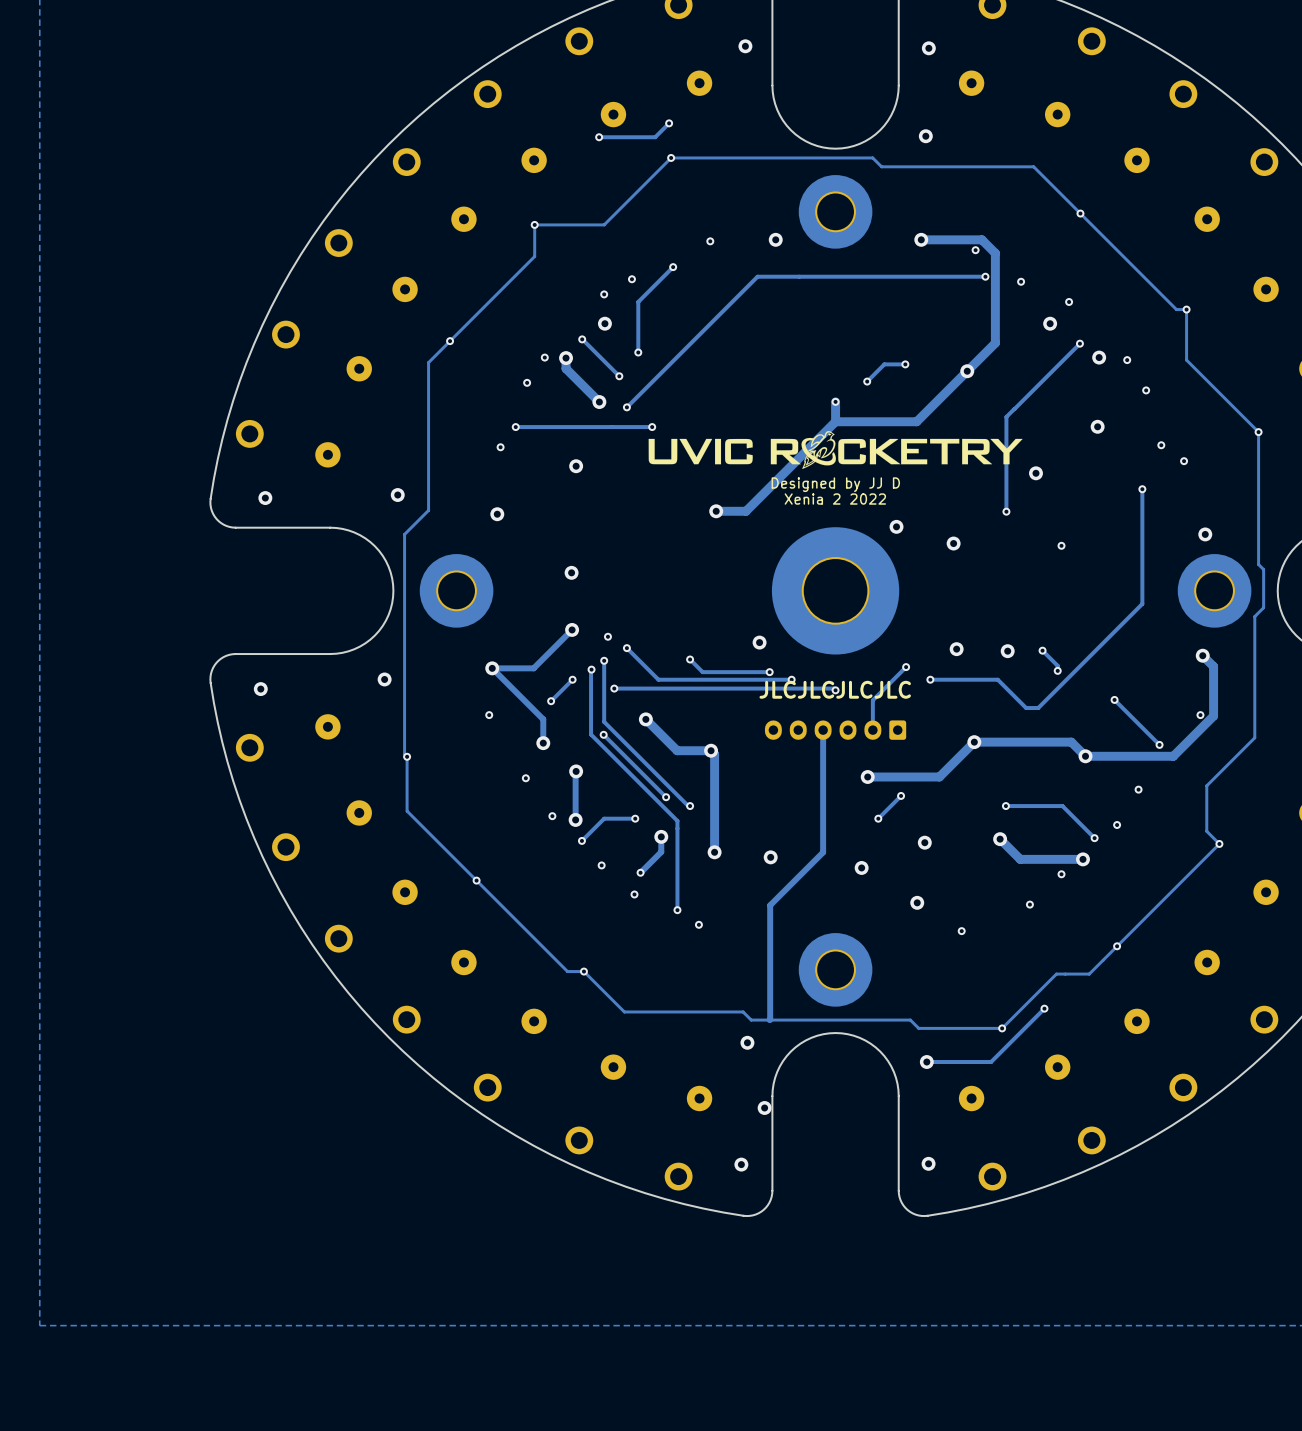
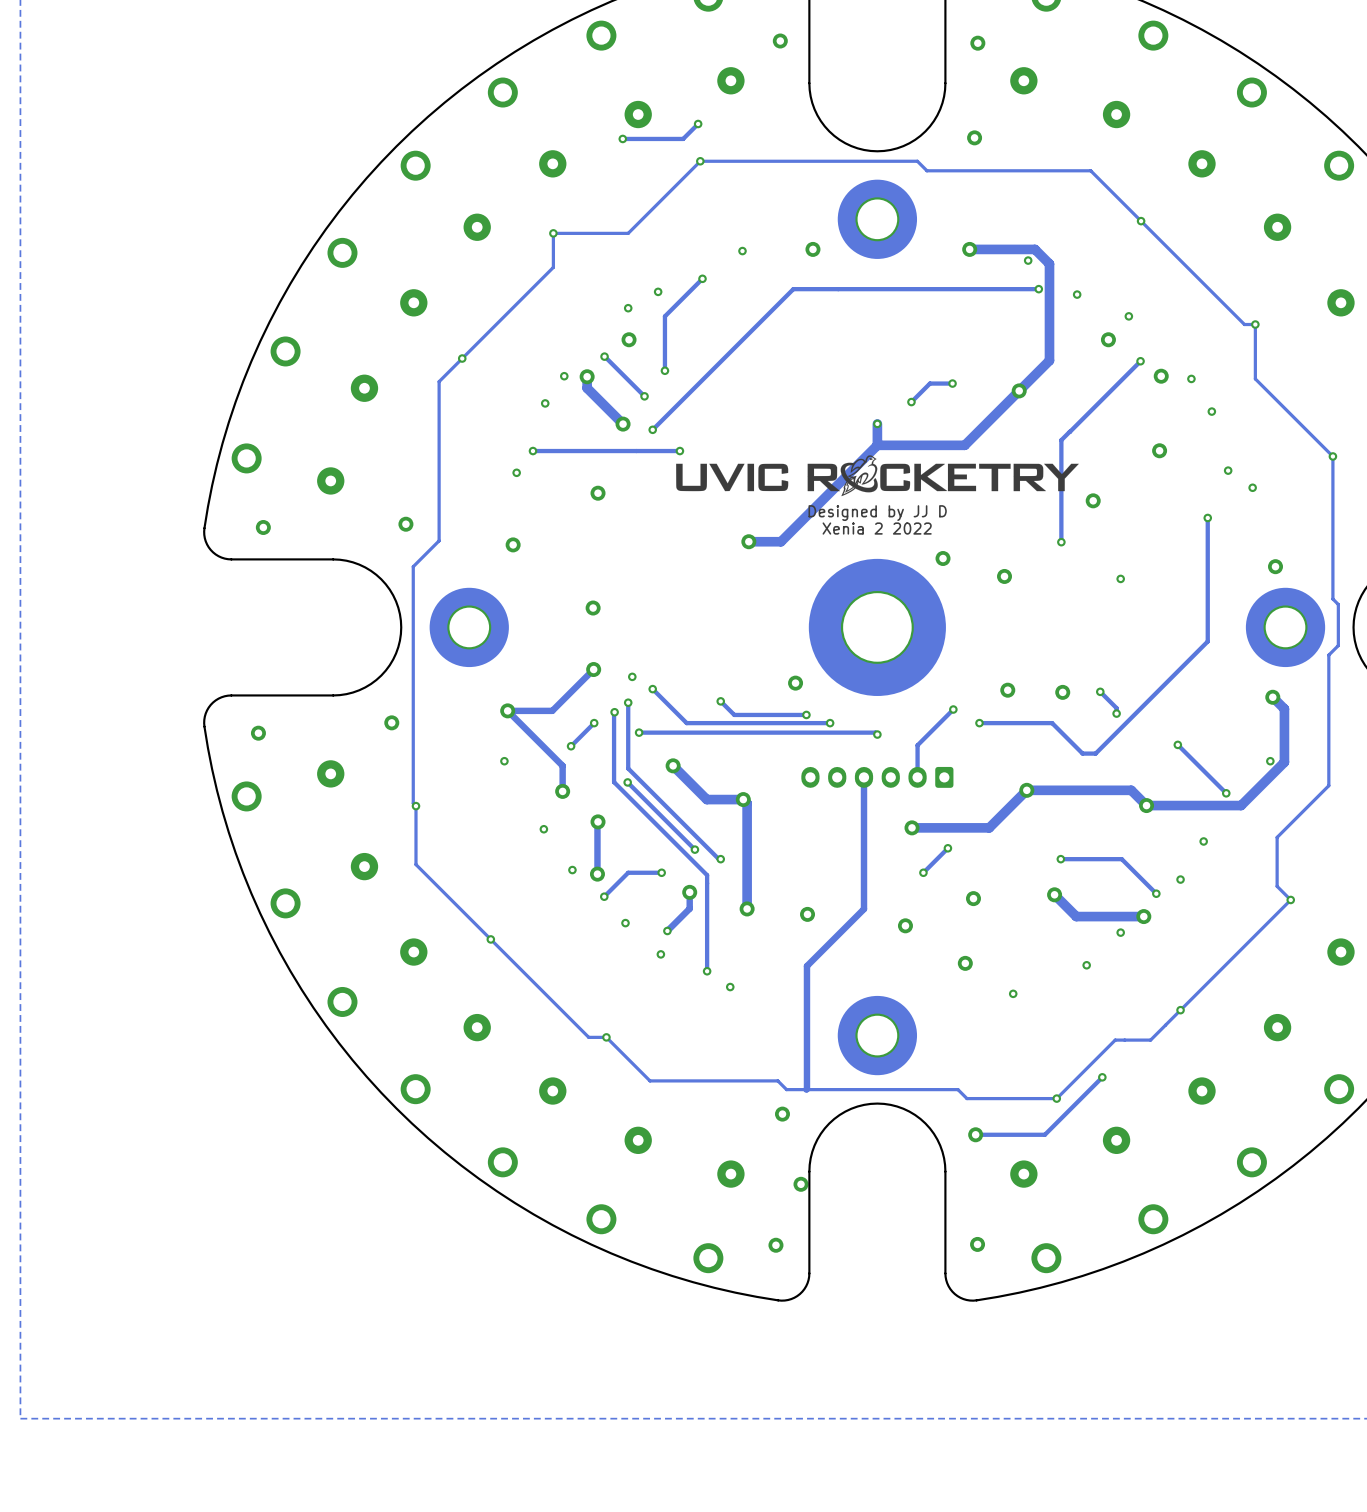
text: JLCJLCJLCJLC (835, 689) -> none

